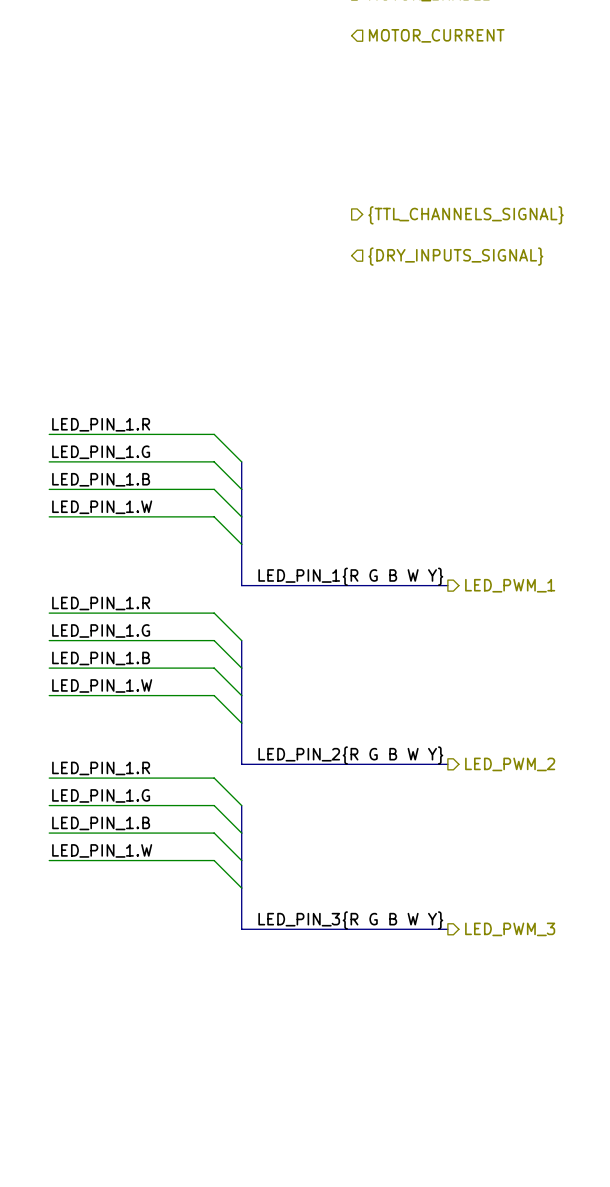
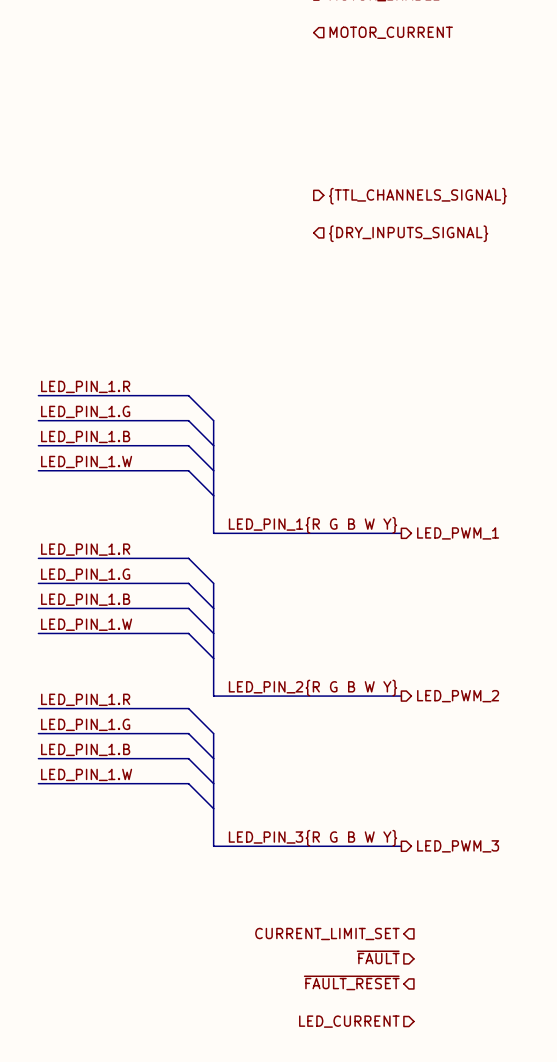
hierarchical label: none -> CURRENT_LIMIT_SET (327, 933)
hierarchical label: none -> ~{FAULT} (378, 957)
hierarchical label: none -> ~{FAULT_RESET} (351, 982)
hierarchical label: none -> LED_CURRENT (349, 1021)

